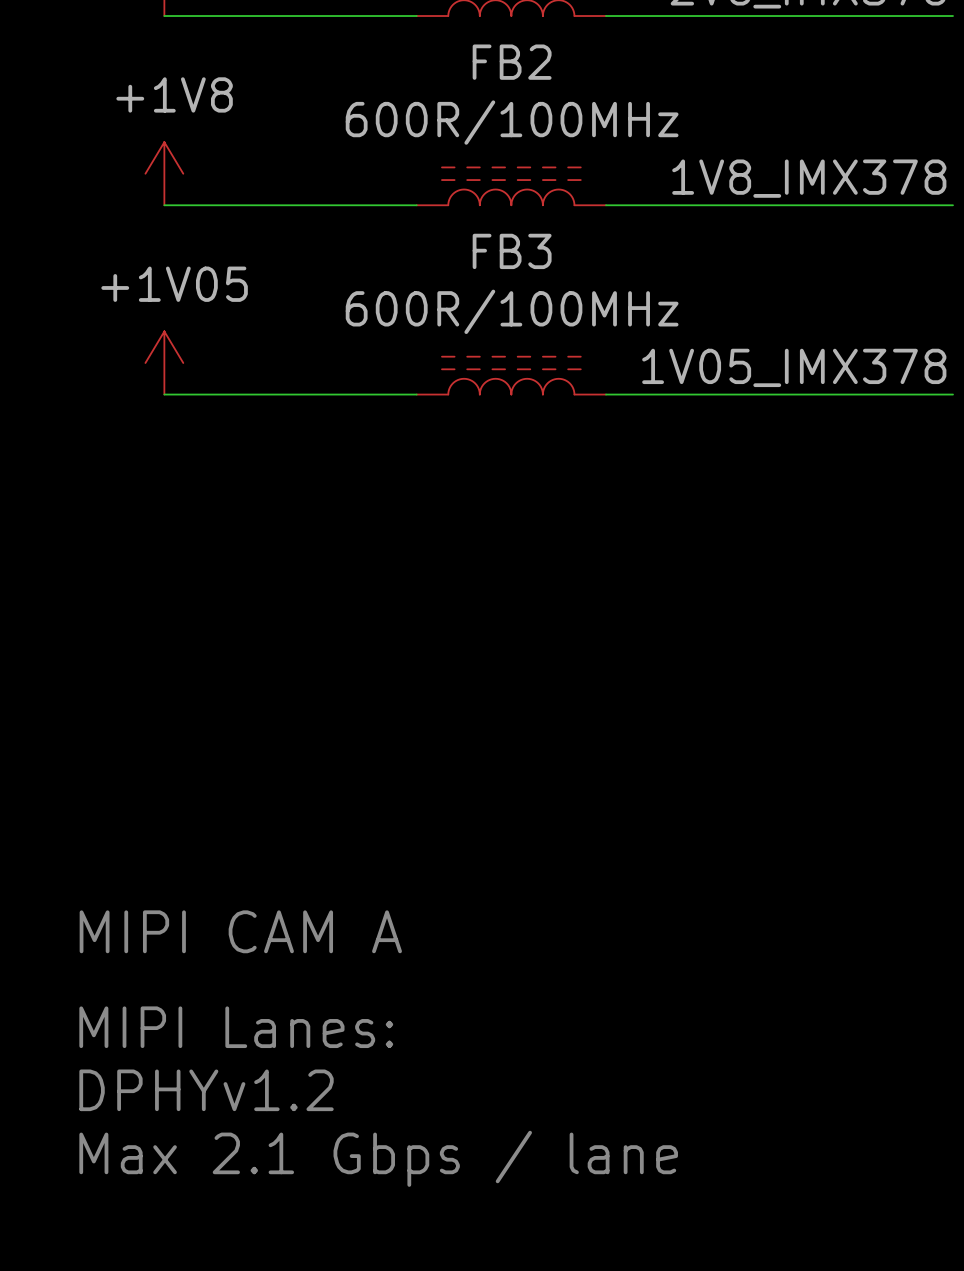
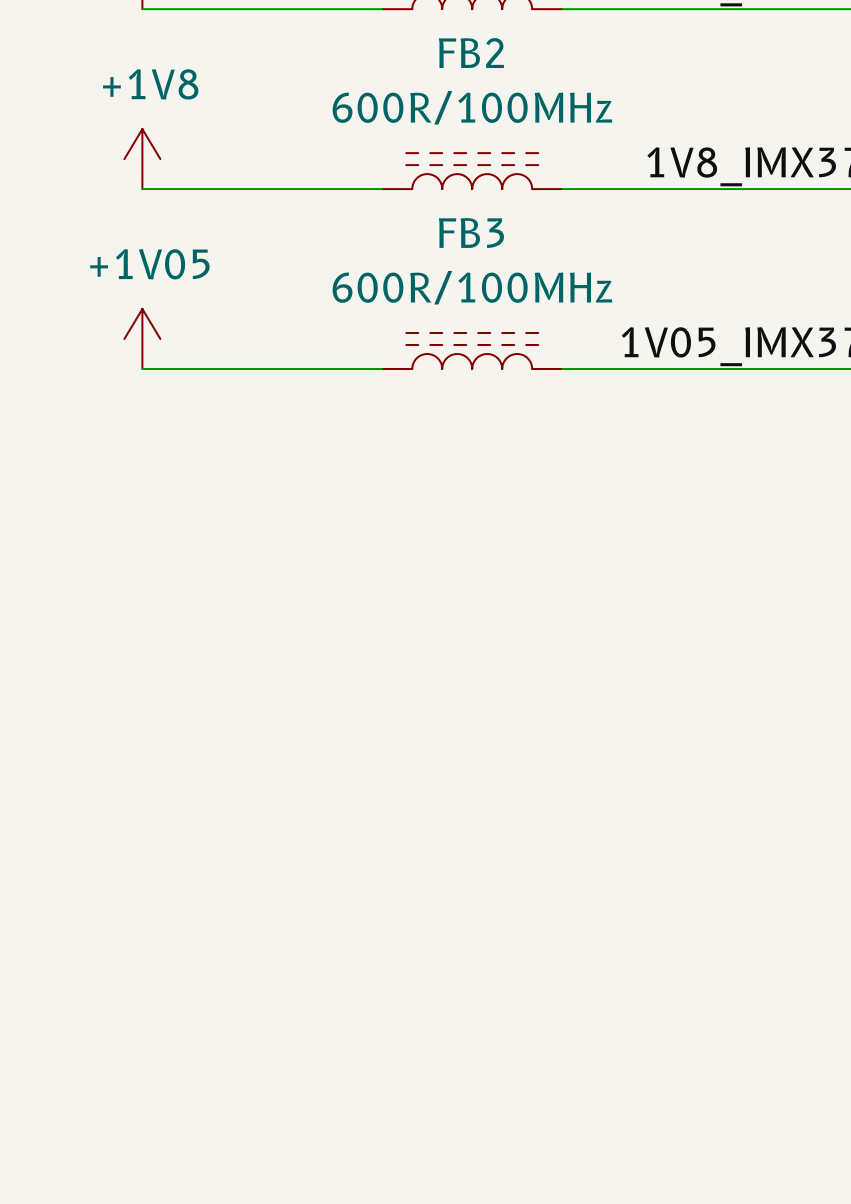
text: MIPI CAM A (240, 931) -> none
text: MIPI Lanes: (236, 1027) -> none
text: DPHYv1.2 (206, 1090) -> none
text: Max 2.1 Gbps / lane (378, 1158) -> none

